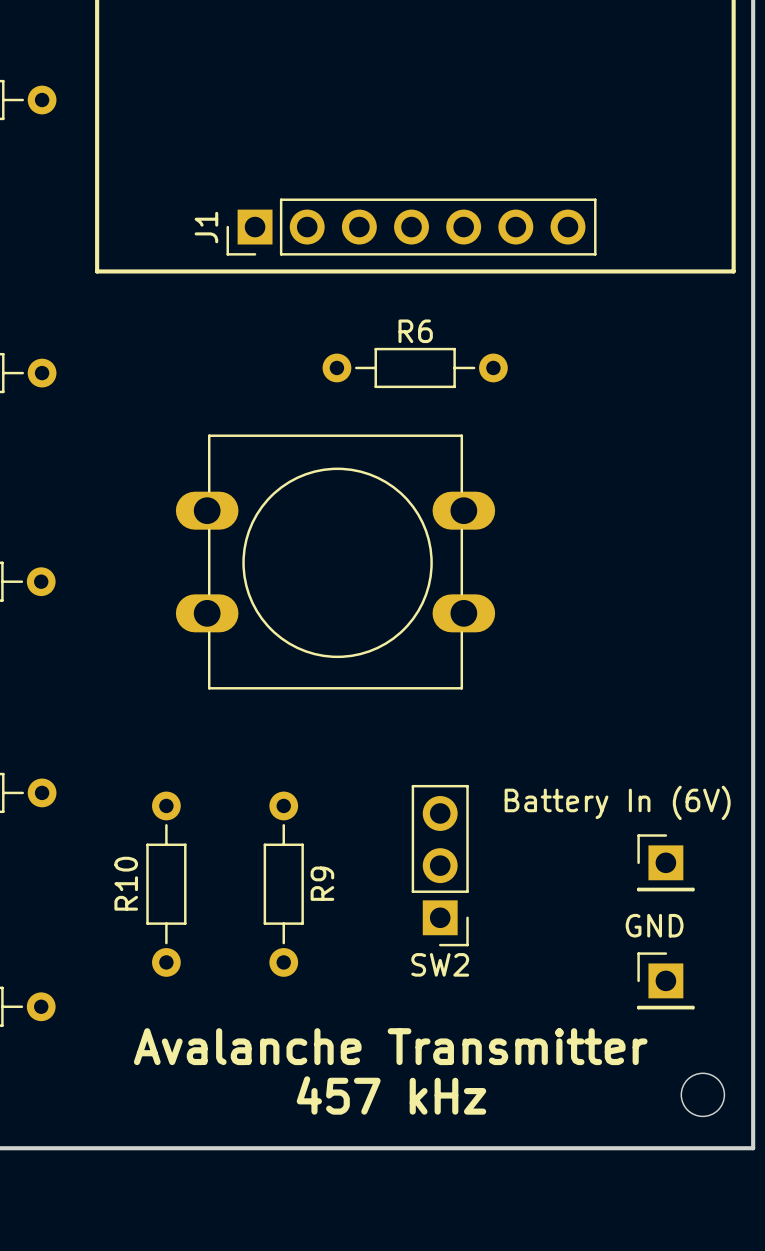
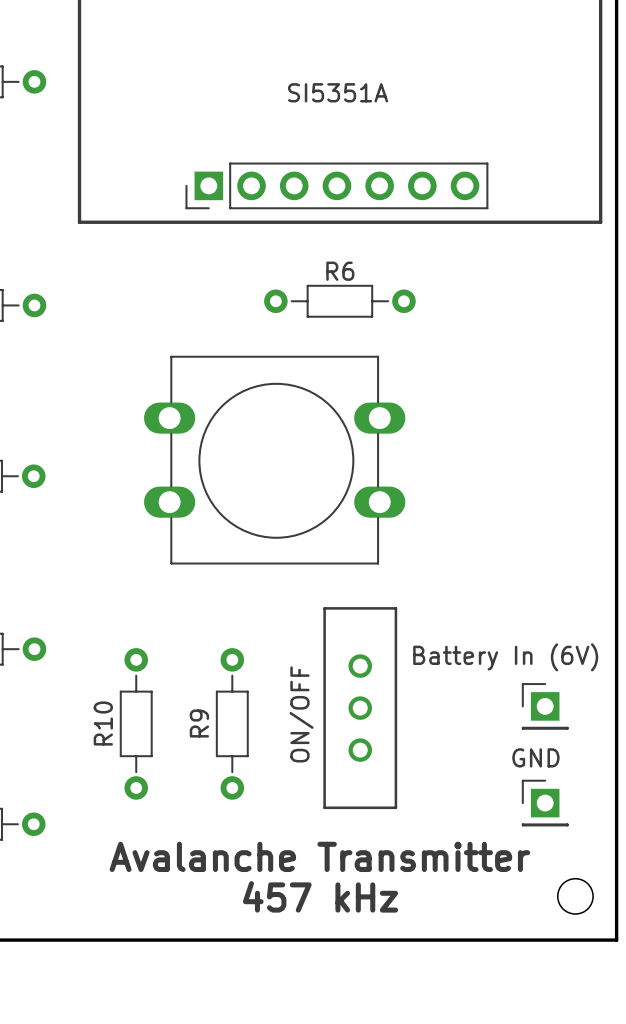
J1 name: J1 (206, 227) -> SI5351A (338, 92)
ON/OFF: none -> (360, 708)
SW2: (440, 865) -> none
R9 name position: R9 (322, 883) -> R9 (199, 723)

